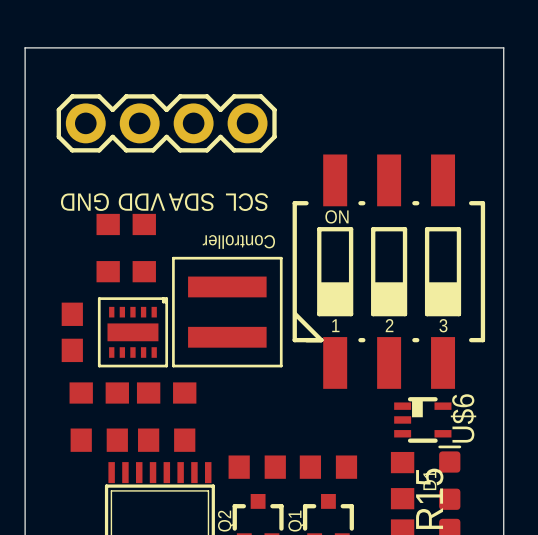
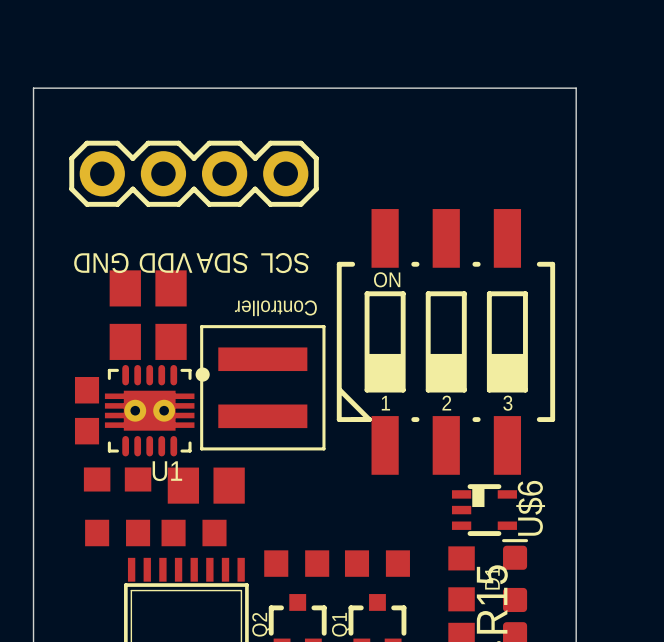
part footprint: [96, 213, 156, 236] -> [109, 270, 187, 307]
part footprint: [96, 261, 156, 283] -> [109, 323, 187, 360]
part: (132, 332) -> none
U1: none -> (157, 410)
part footprint: [136, 382, 197, 404] -> [167, 467, 245, 504]

